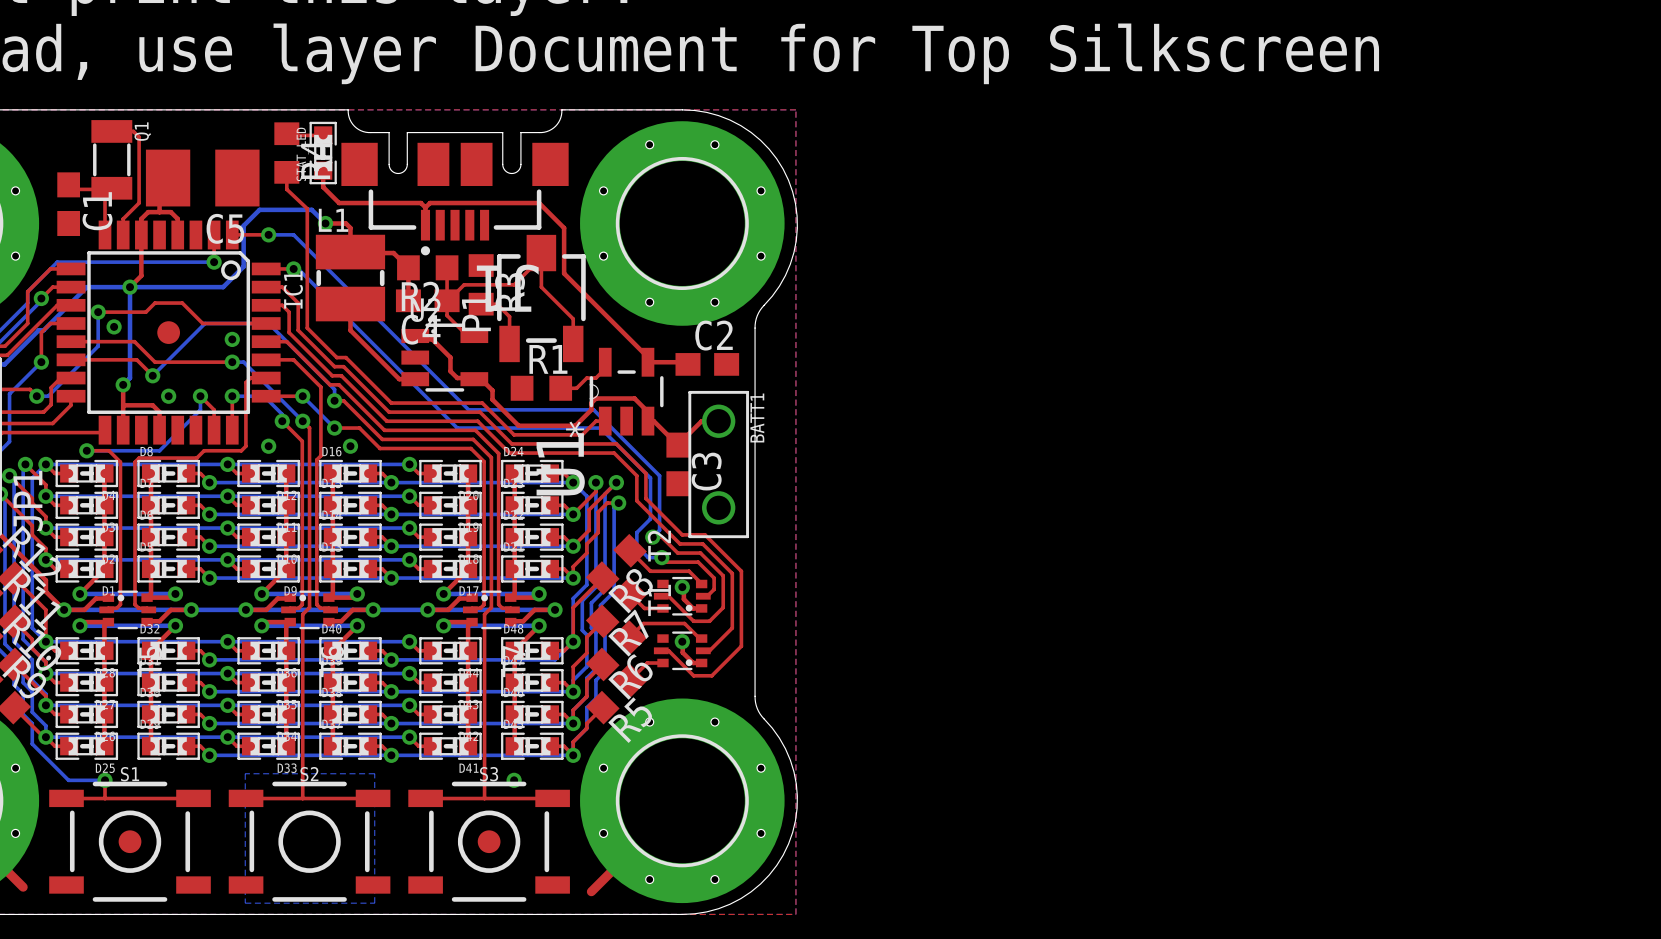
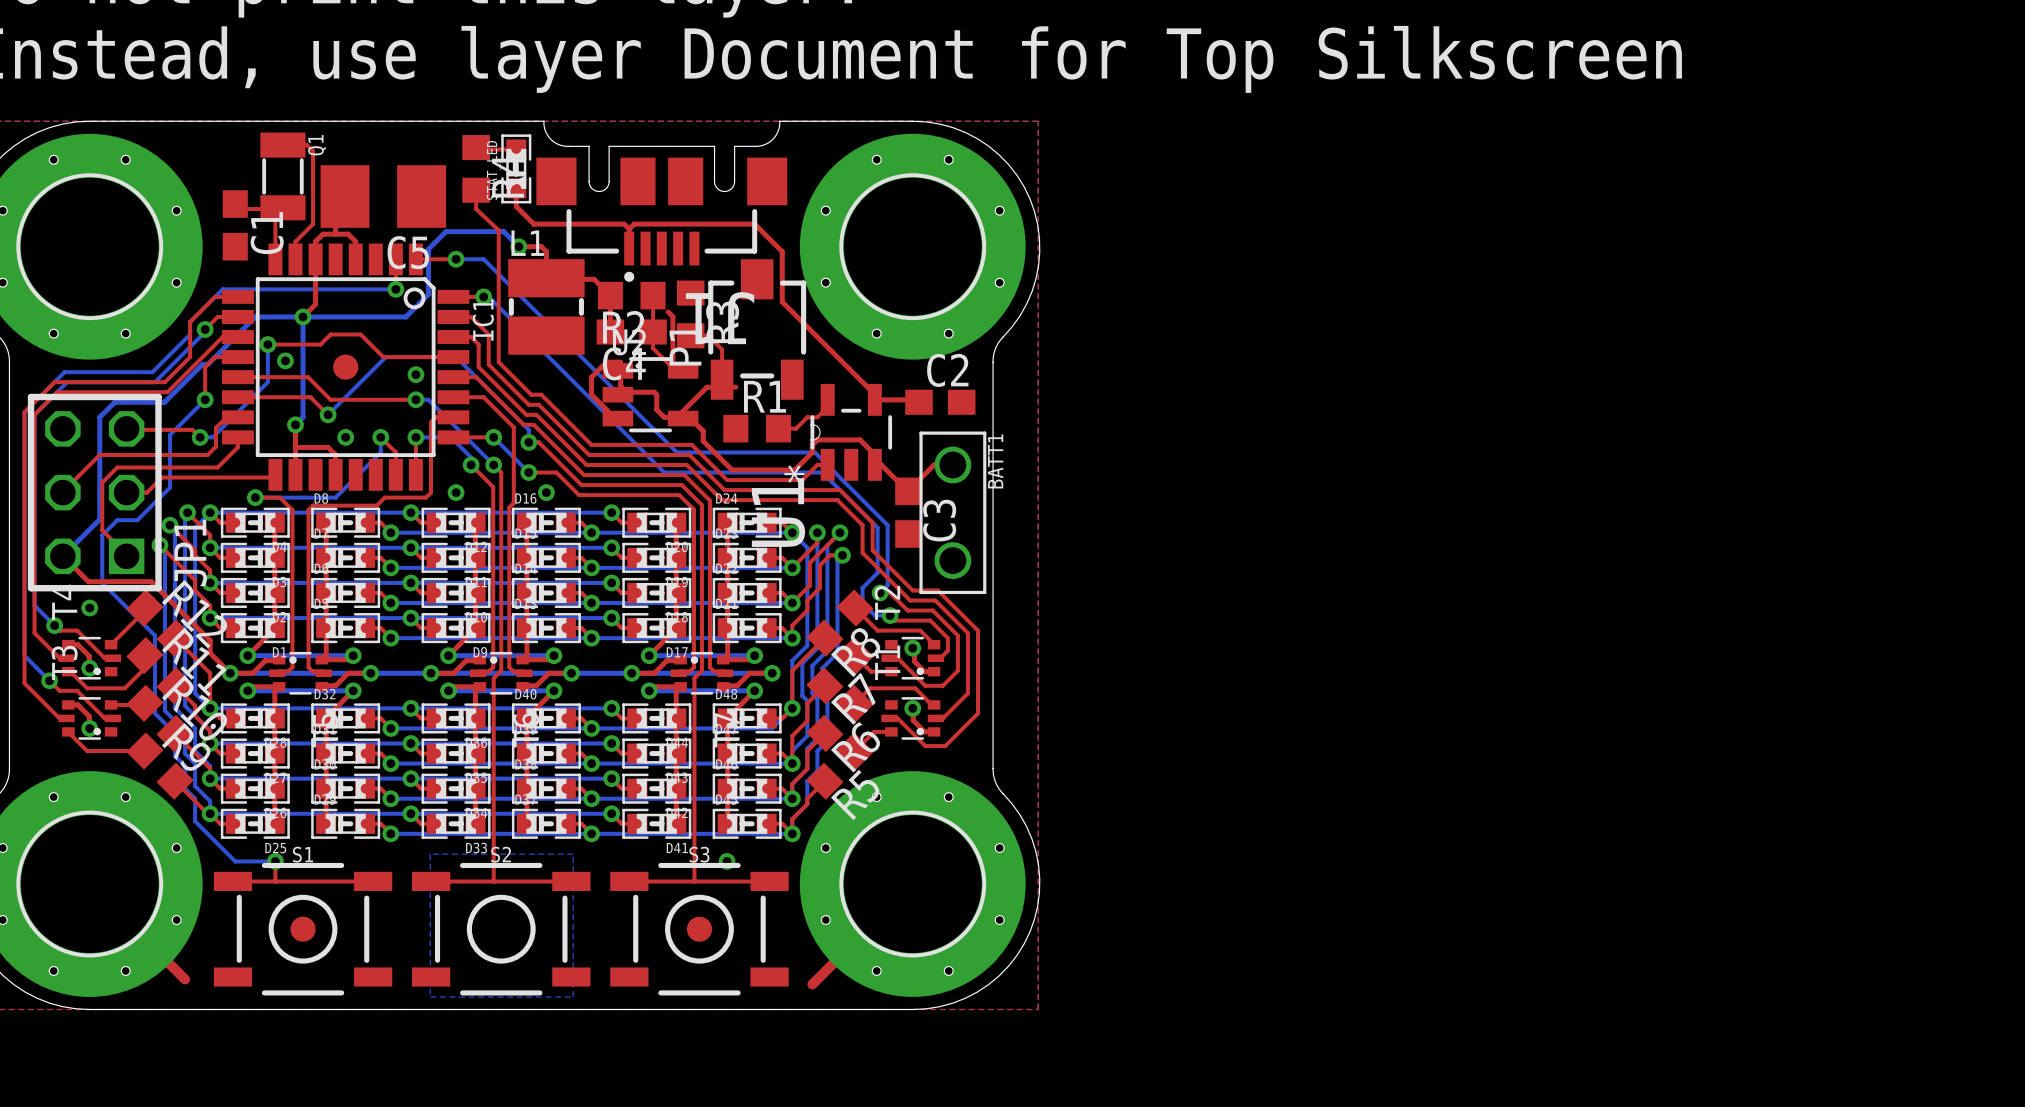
top track: (541, 253) (541, 287) (573, 318) (573, 343) -> none
top track: (541, 257) (514, 284) (464, 284) (447, 300) -> none
top track: none -> (668, 311) (672, 316) (672, 362)
top track: (350, 304) (350, 330) (399, 379) (415, 379) -> none
top track: none -> (620, 362) (606, 362) (591, 377) (591, 394) (614, 417)
top track: (415, 336) (418, 339) (432, 339) (448, 355) -> (620, 378) (620, 386) (626, 392) (654, 392)
top track: none -> (735, 387) (707, 387) (679, 414) (679, 417)

